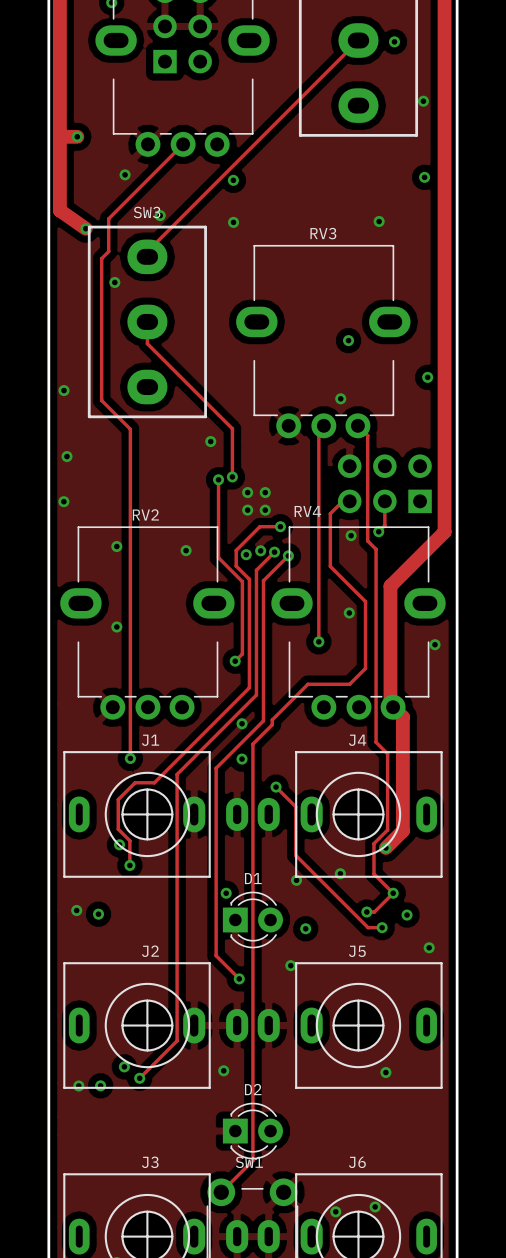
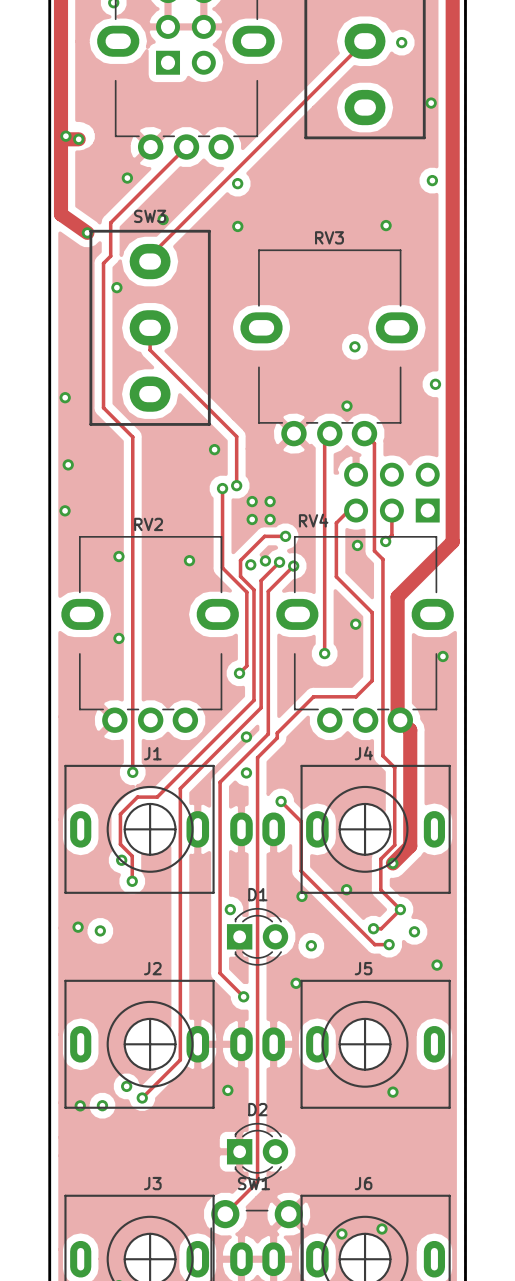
via: none -> (65, 136)

